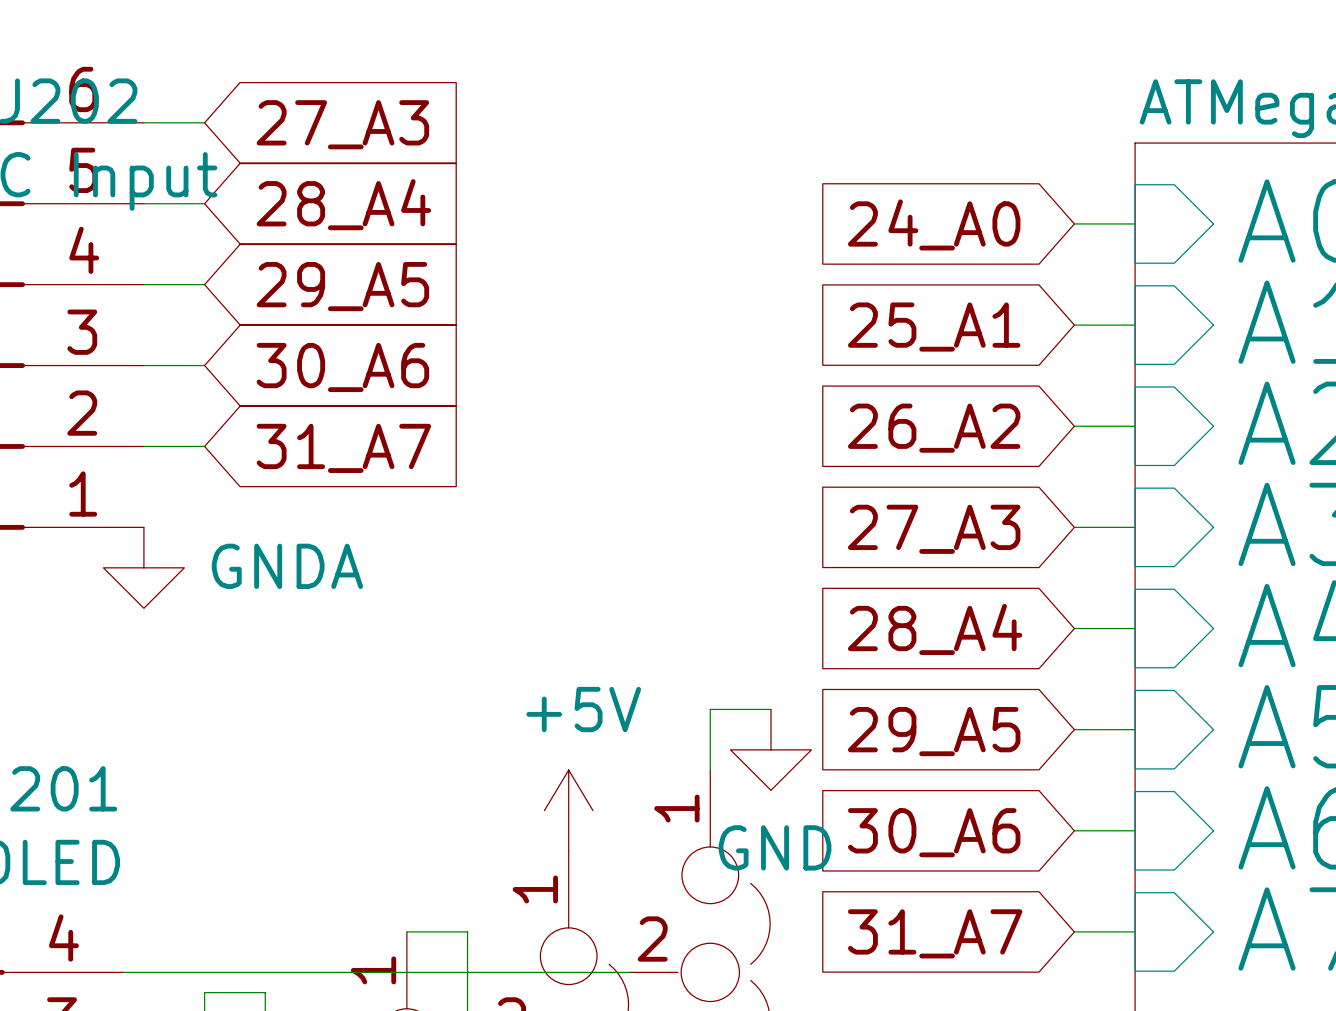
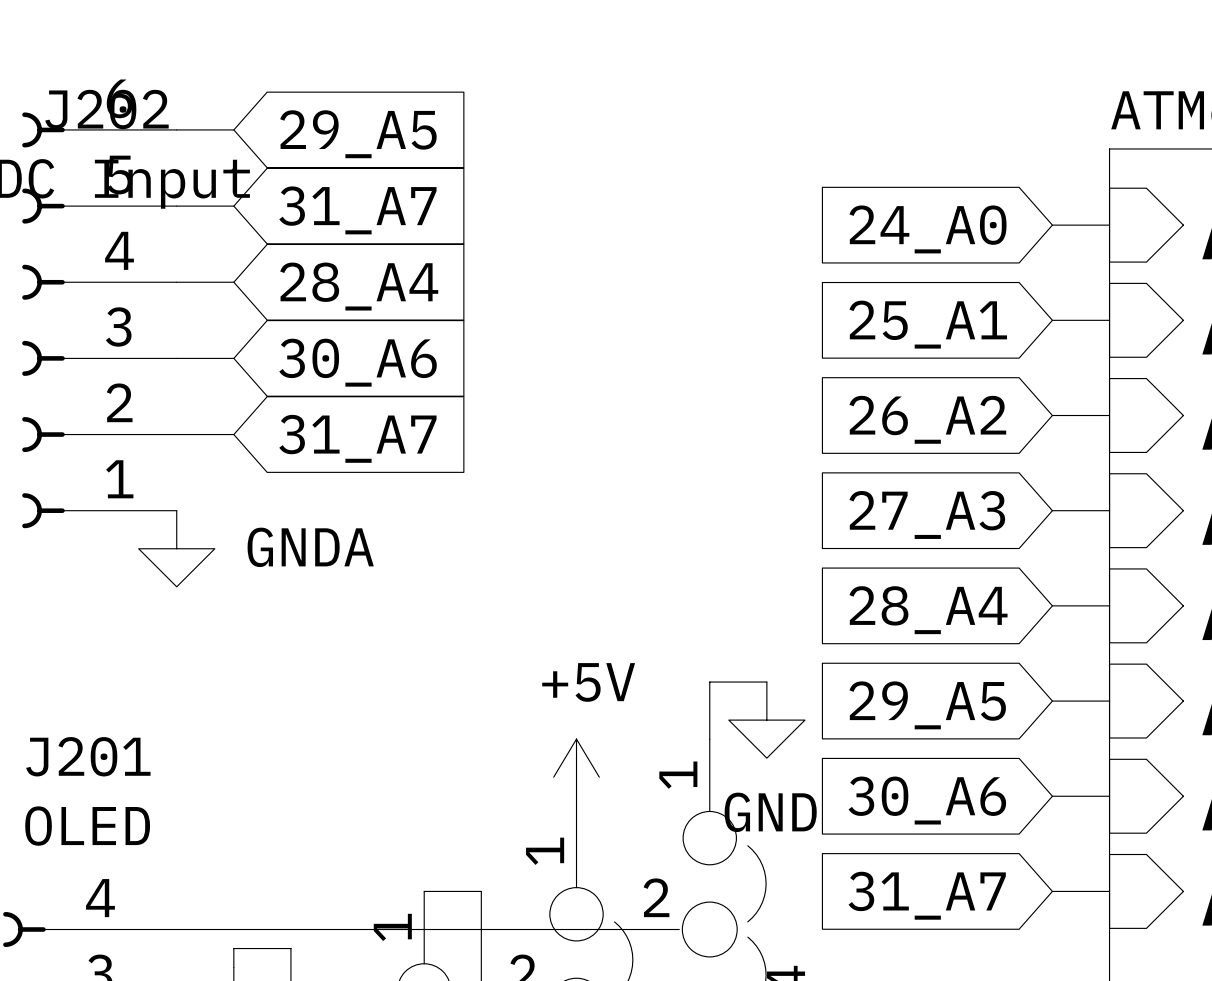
global label: 27_A3 (342, 124) -> 29_A5 (358, 134)
global label: 28_A4 (343, 204) -> 31_A7 (357, 210)
global label: 29_A5 (342, 286) -> 28_A4 (359, 286)

